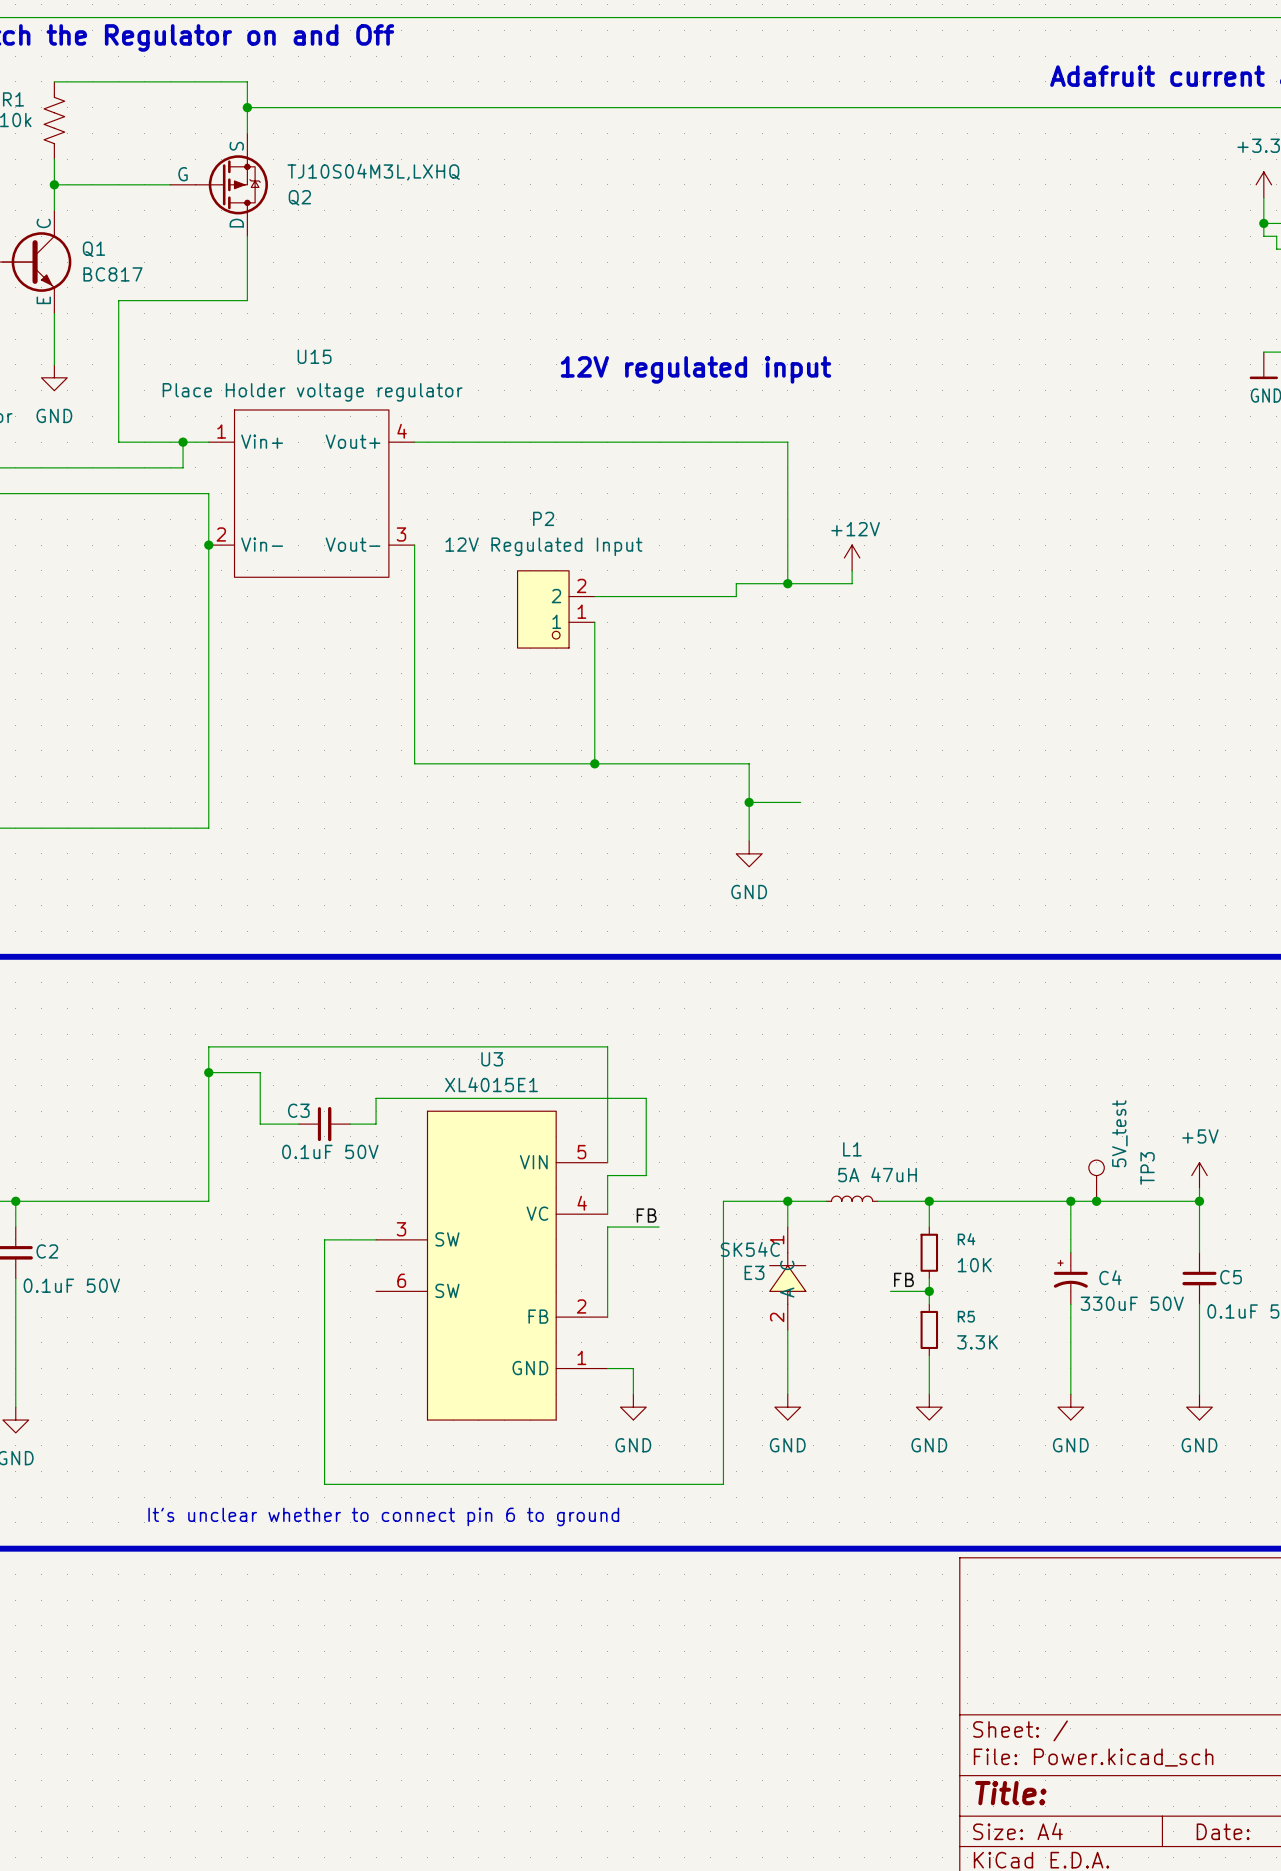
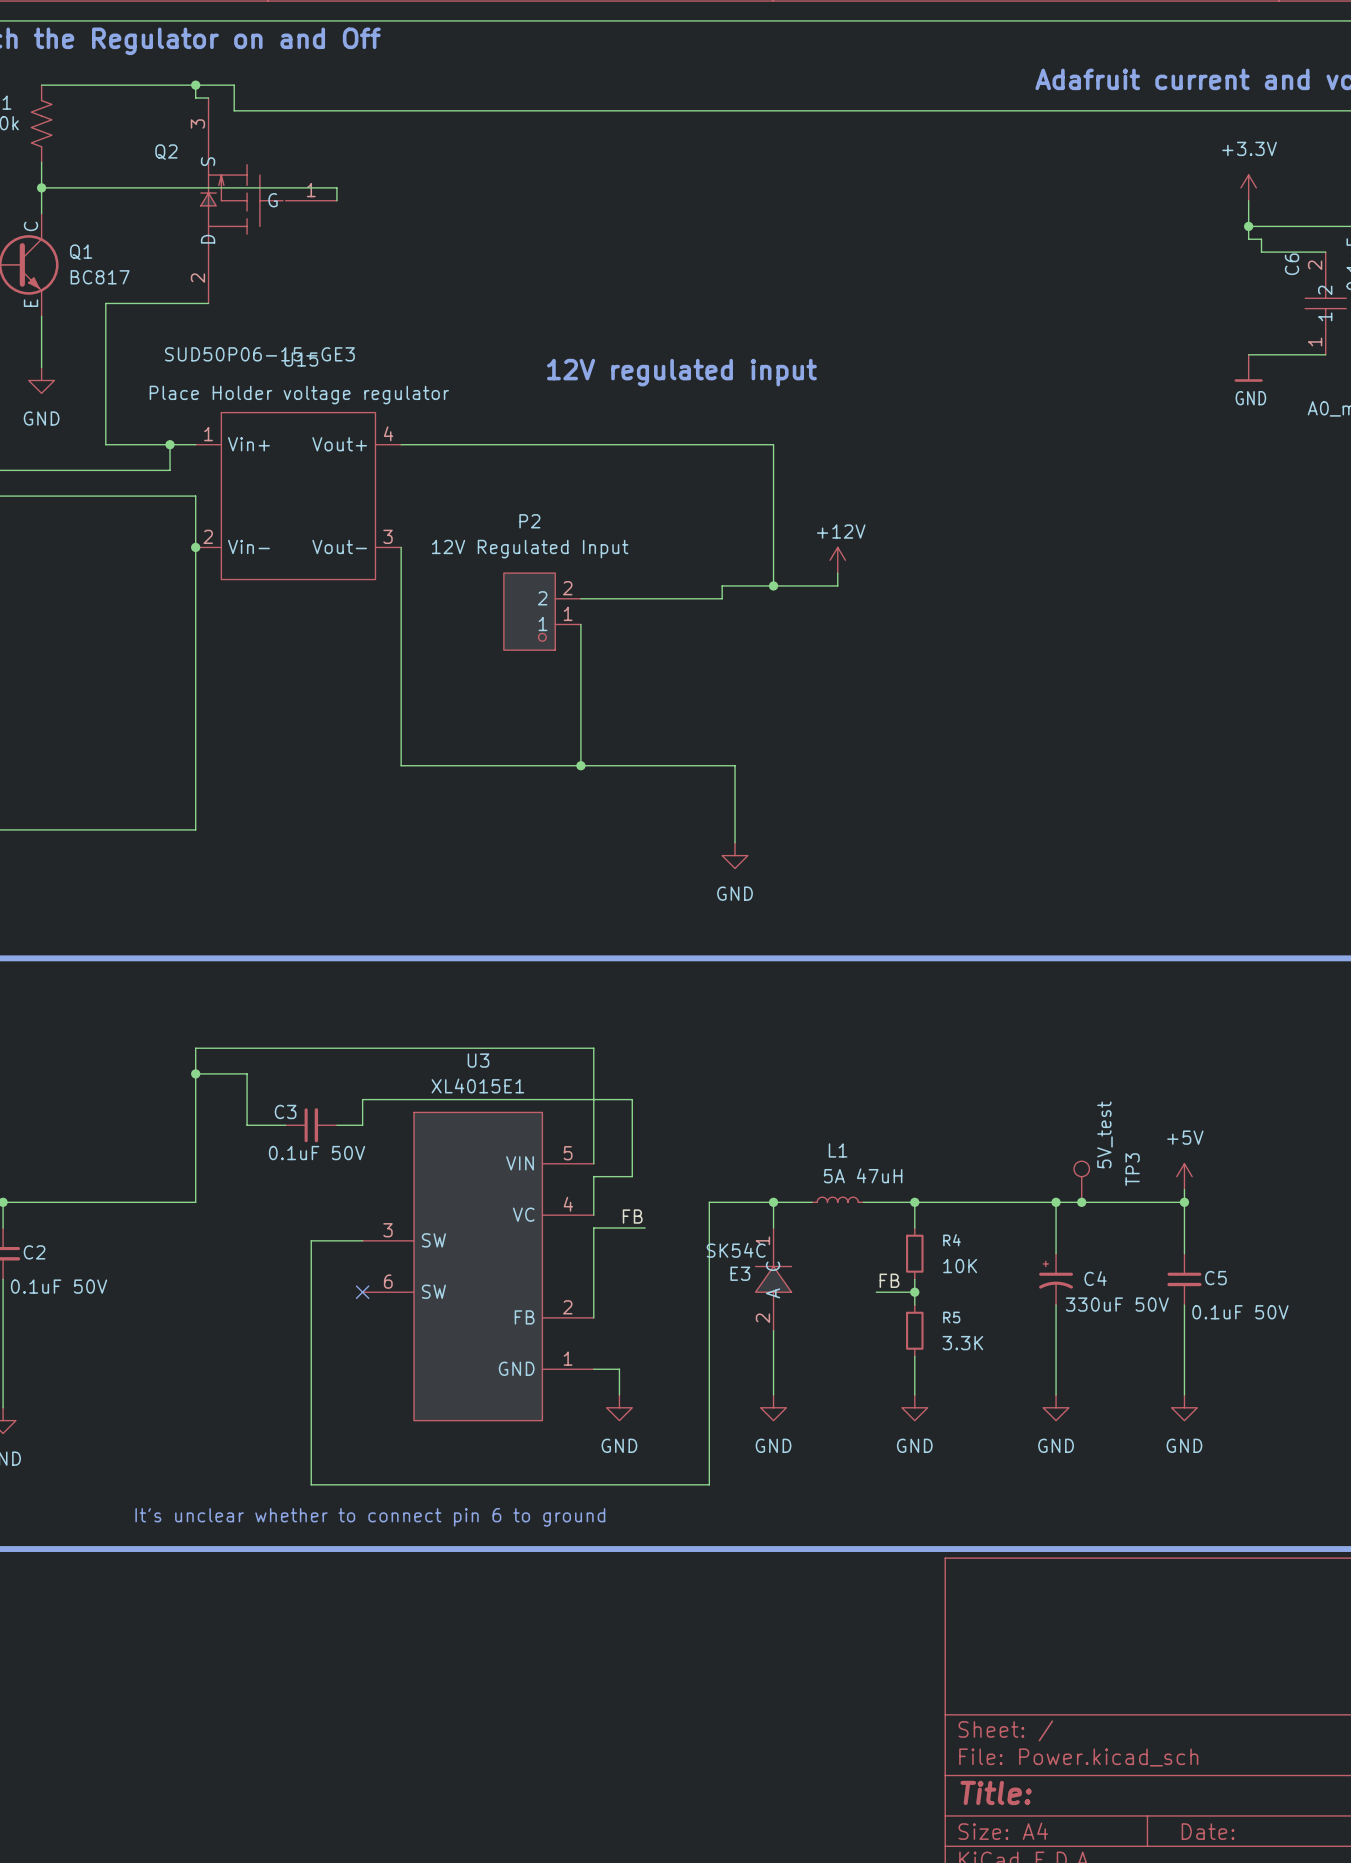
wire: none -> (195, 85) (195, 98) (208, 98)
wire: (247, 107) (247, 133) -> none
junction position: (247, 107) -> (195, 85)
Q2 symbol: [170, 133, 268, 237] -> [200, 98, 337, 304]
Q2 value: TJ10S04M3L,LXHQ (373, 172) -> SUD50P06-15-GE3 (259, 354)
wire: none -> (157, 187) (336, 187) (336, 200)
Q2 name position: Q2 (299, 197) -> Q2 (166, 152)
wire: (247, 236) (247, 300) (221, 300) -> none
wire: (749, 802) (800, 802) -> none
junction: (749, 802) -> none
no-connect mark: none -> (362, 1292)

